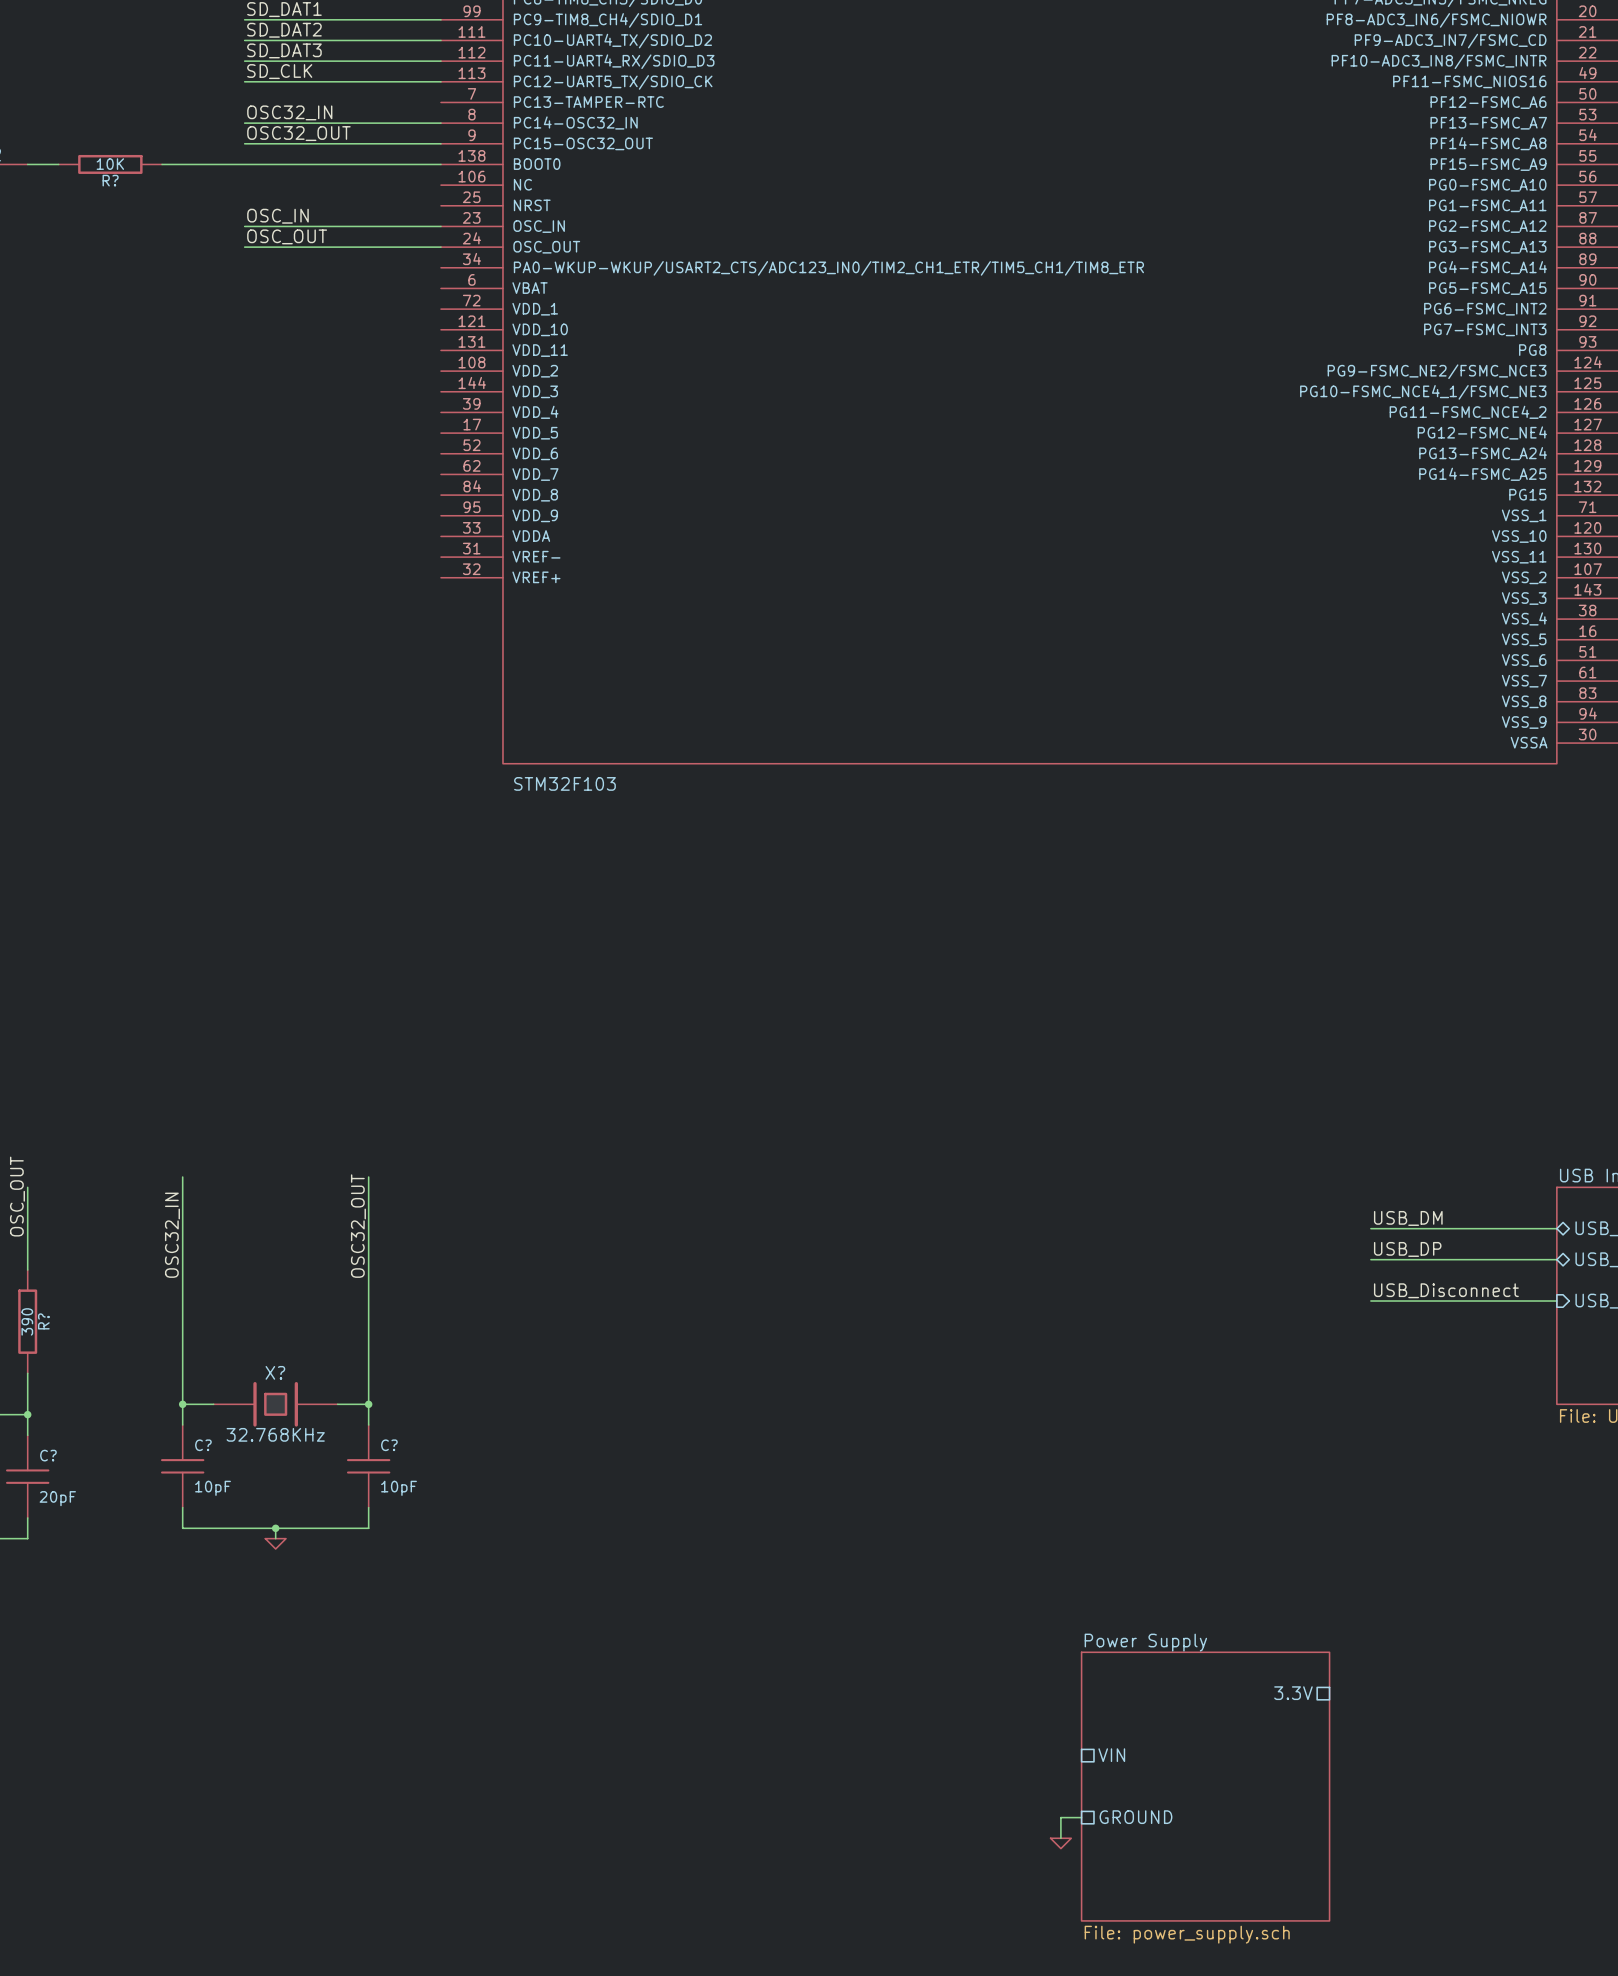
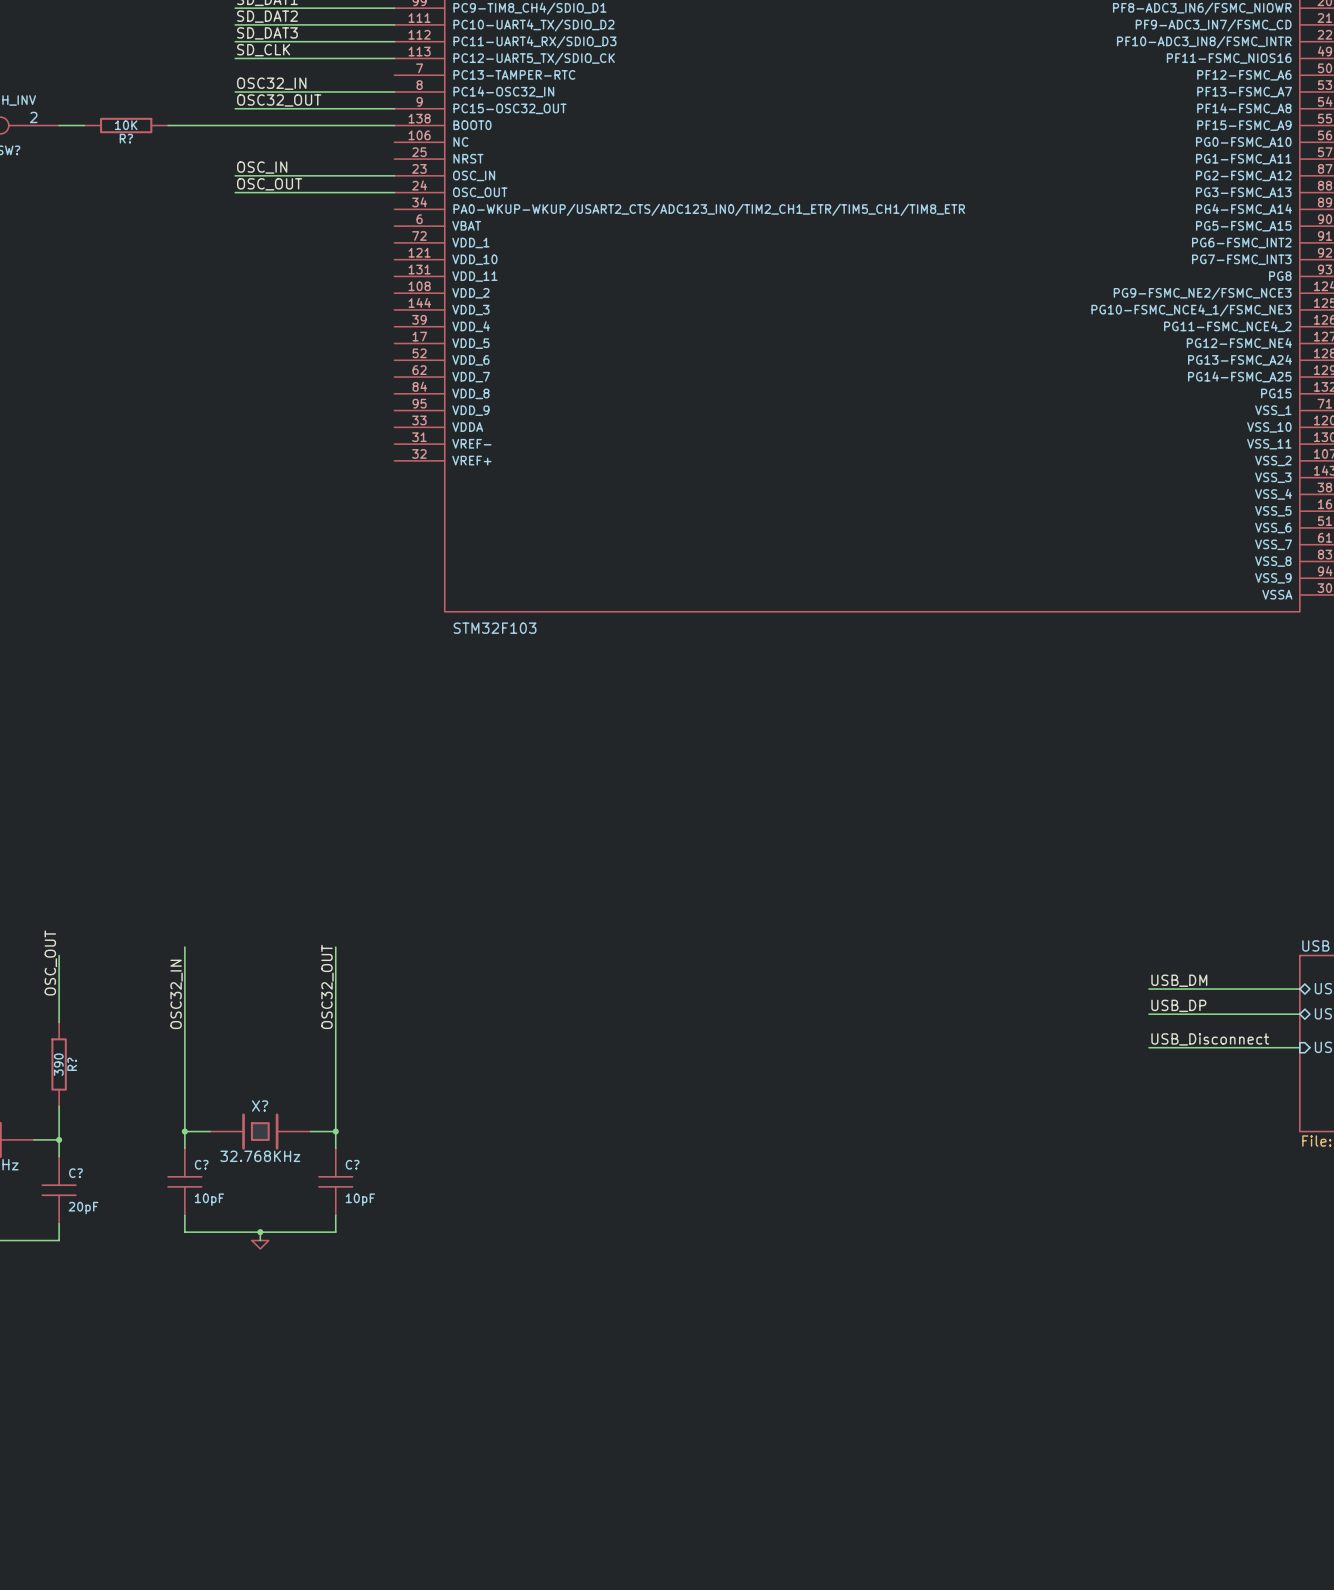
sheet pin: 3.3V (1293, 1693) -> none
sheet pin: VIN (1111, 1755) -> none
sheet Power Supply: File: power_supply.sch (1205, 1786) -> none
wire: (1081, 1817) (1060, 1817) (1060, 1838) -> none
sheet pin: GROUND (1135, 1817) -> none
power symbol: (1060, 1843) -> none

